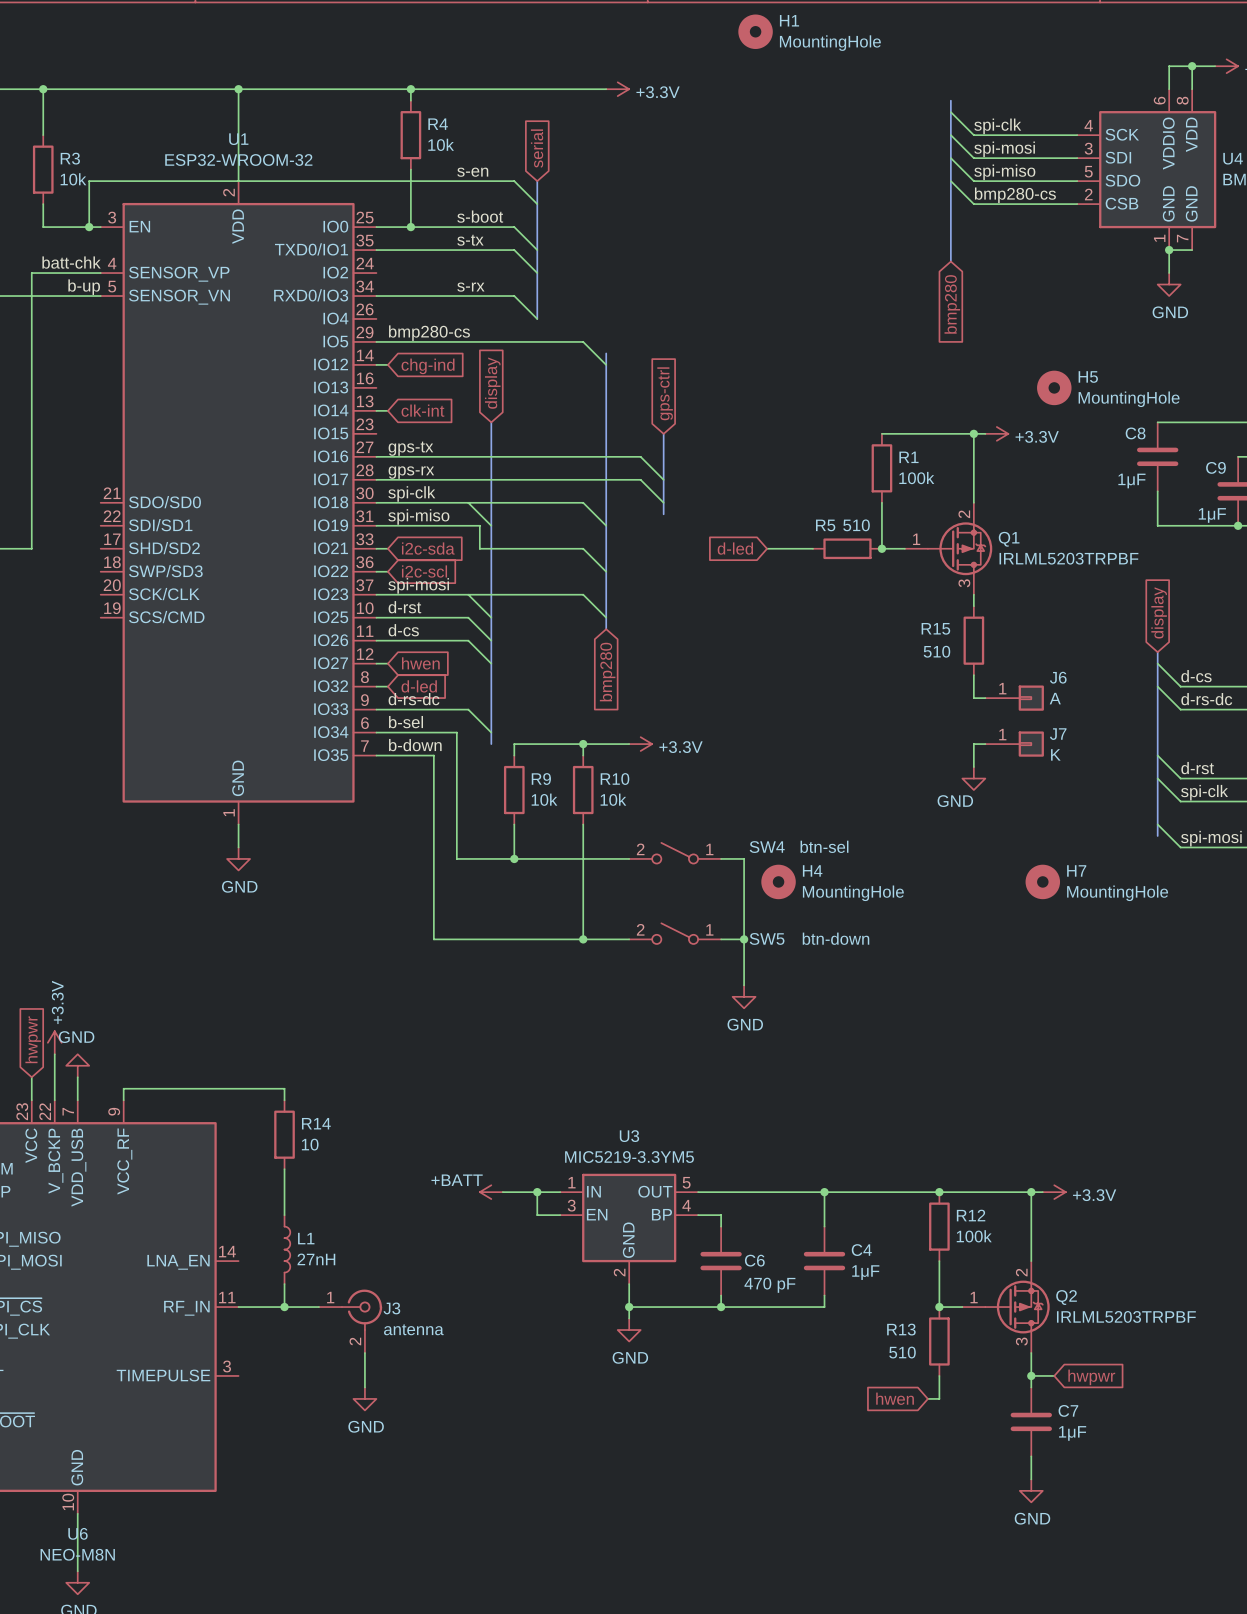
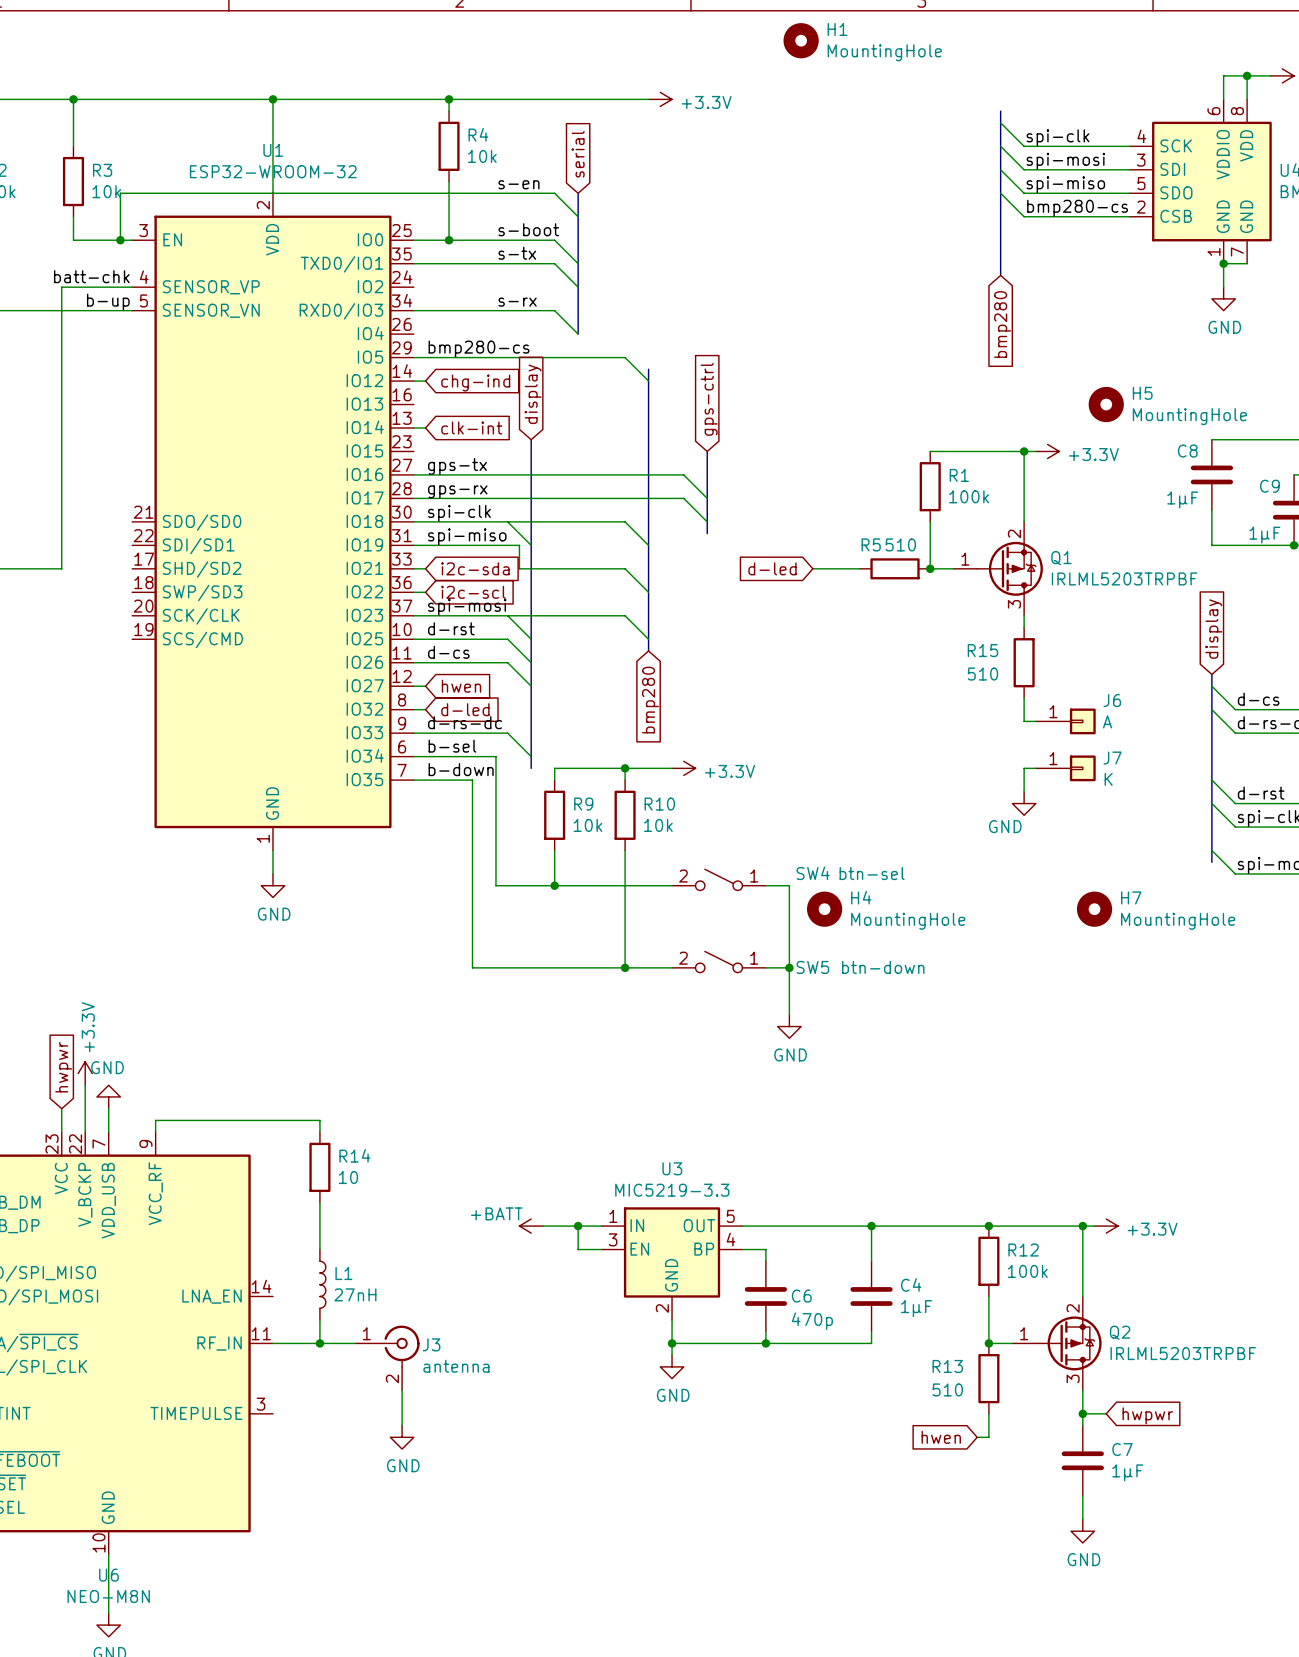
U3 value: MIC5219-3.3YM5 (629, 1157) -> MIC5219-3.3 (672, 1190)
C6 value: 470 pF (769, 1285) -> 470p (812, 1321)

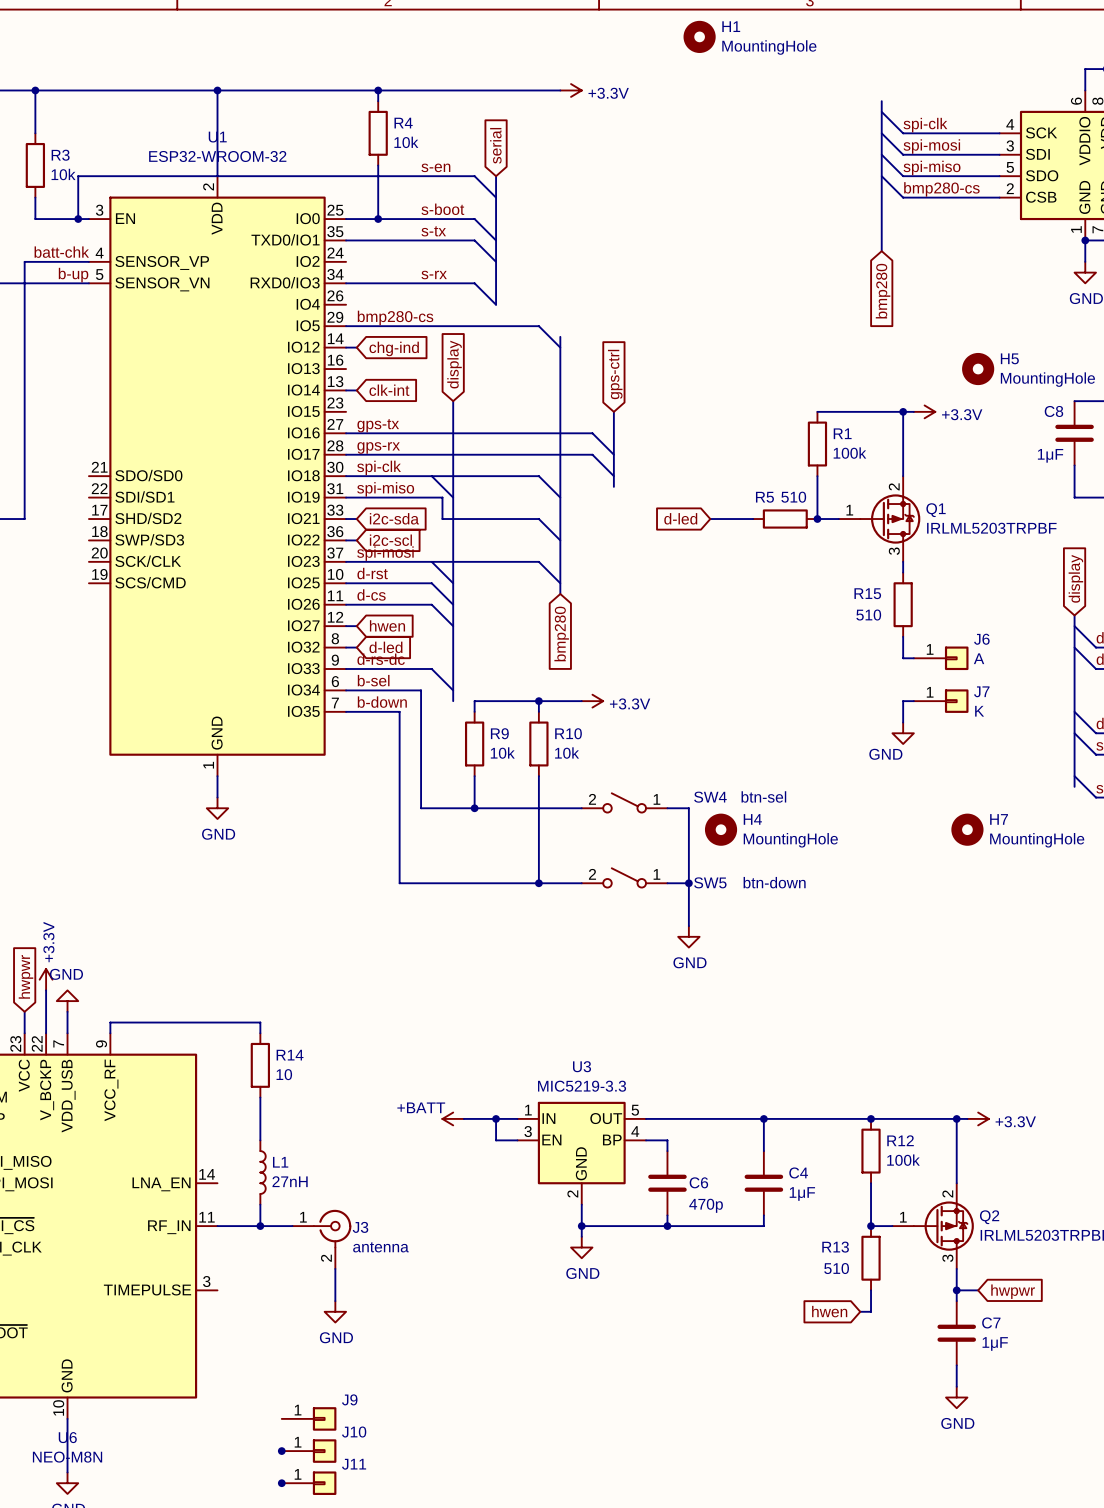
J9: none -> (309, 1418)
junction: none -> (281, 1451)
J10: none -> (309, 1451)
junction: none -> (281, 1483)
J11: none -> (309, 1483)

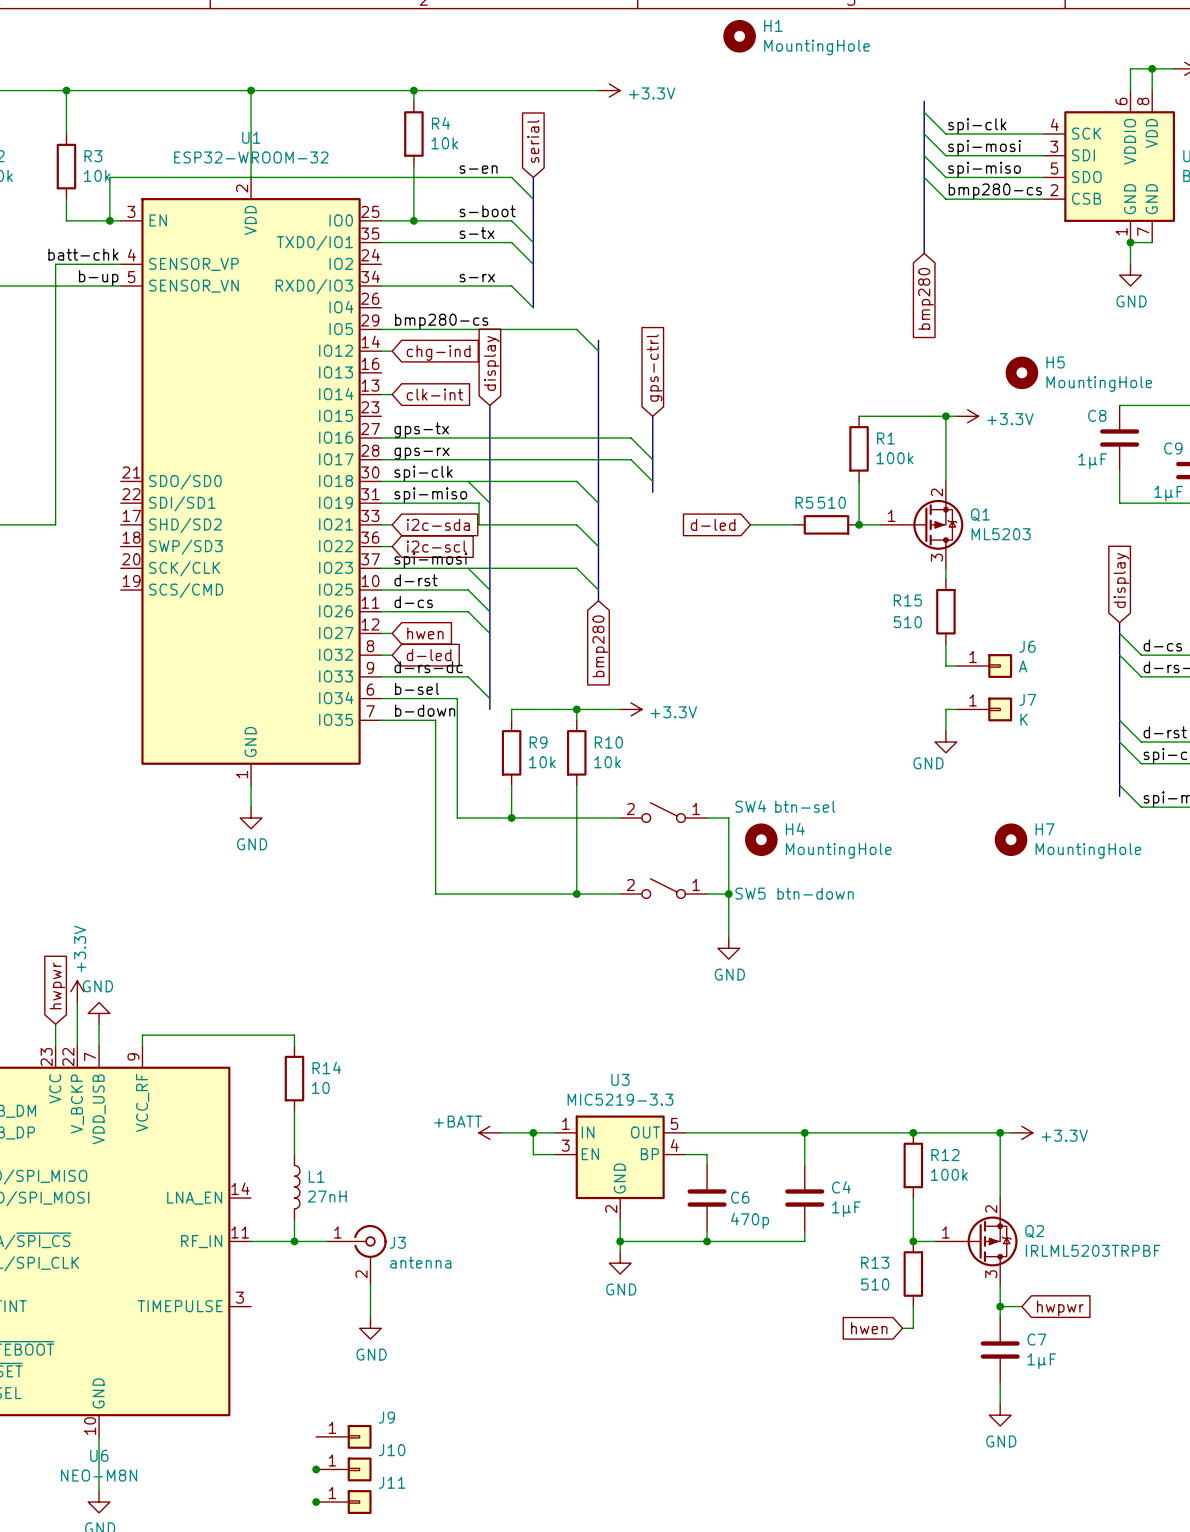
Q1 value: IRLML5203TRPBF (991, 528) -> ML5203 (1001, 534)

